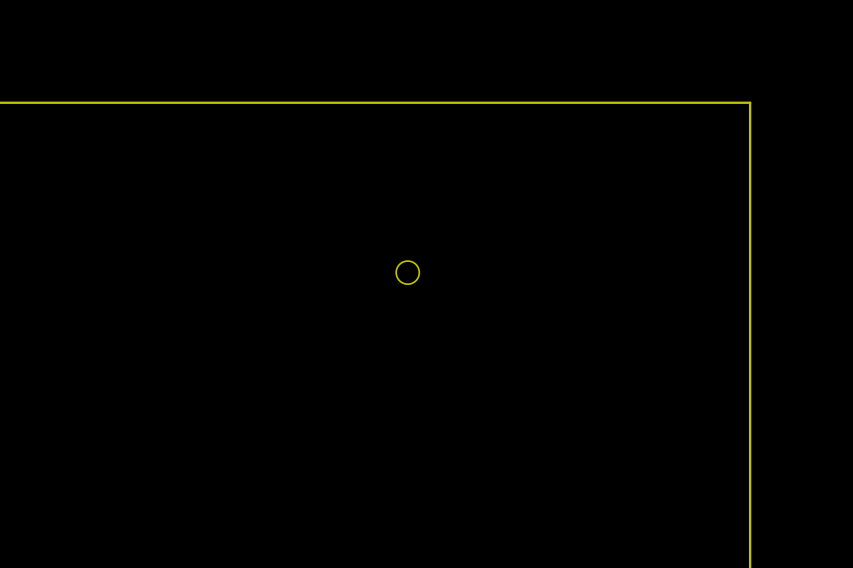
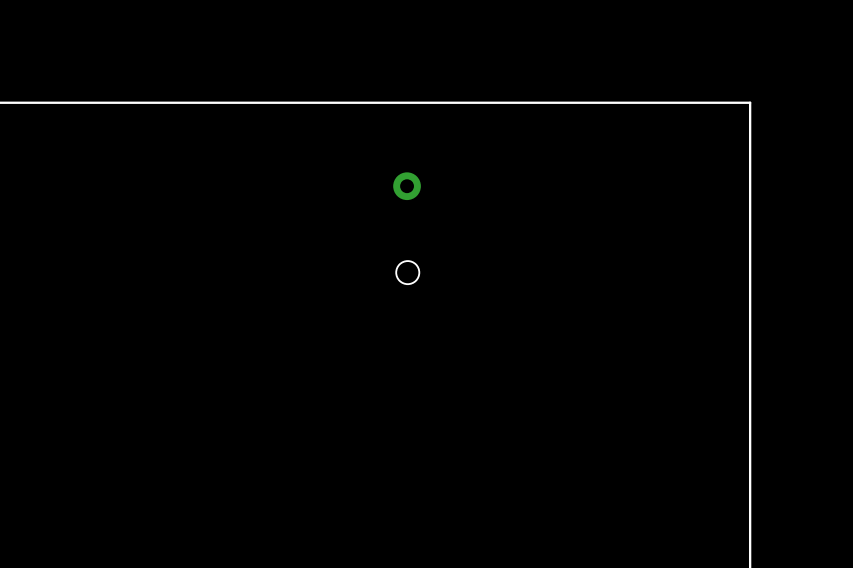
via: none -> (407, 186)

